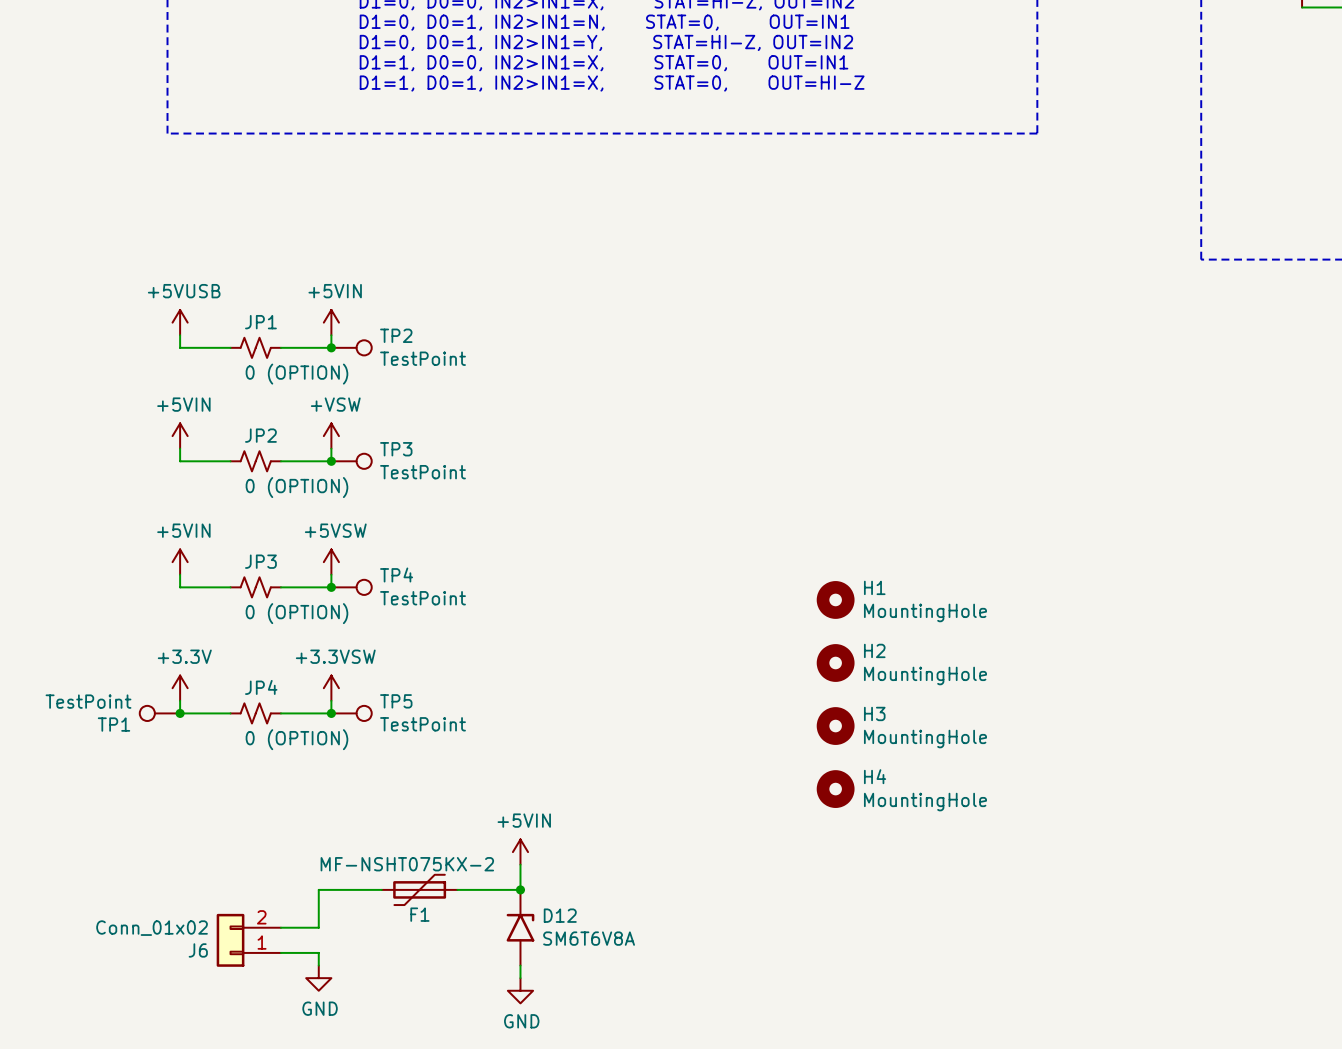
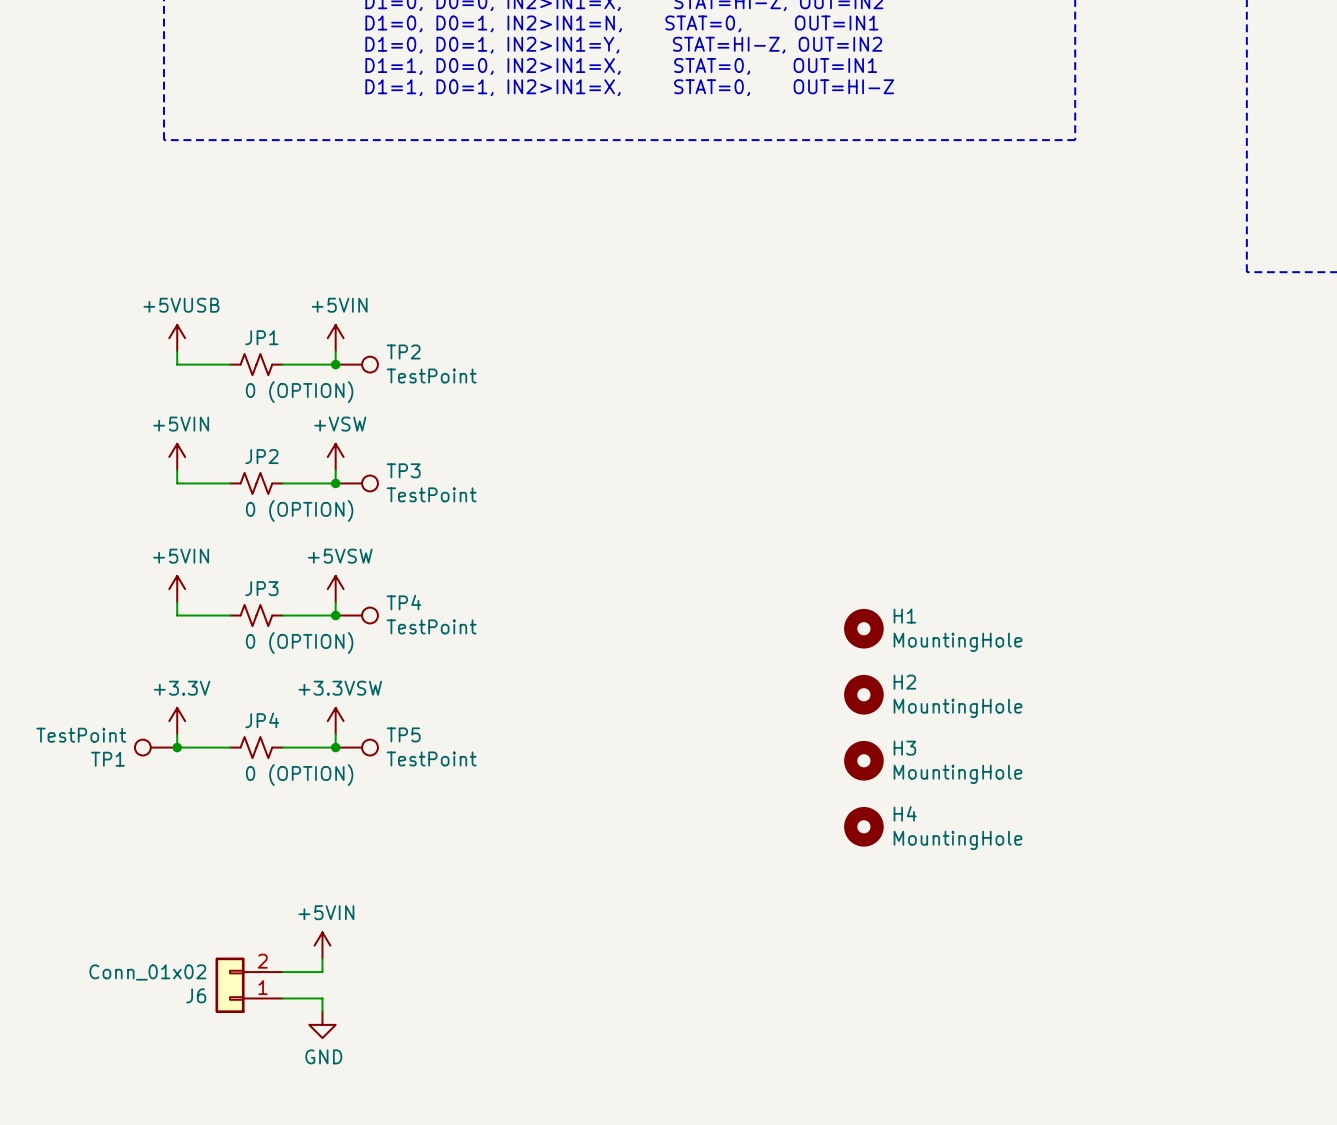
power symbol position: +5VIN (520, 852) -> +5VIN (322, 945)
wire: (520, 864) (520, 889) (457, 889) -> none
wire: (381, 889) (318, 889) (318, 915) -> none
F1: MF-NSHT075KX-2 (419, 889) -> none
junction: (520, 889) -> none
D12: SM6T6V8A (520, 927) -> none
wire: (520, 965) (520, 978) -> none
power symbol: GND (520, 990) -> none

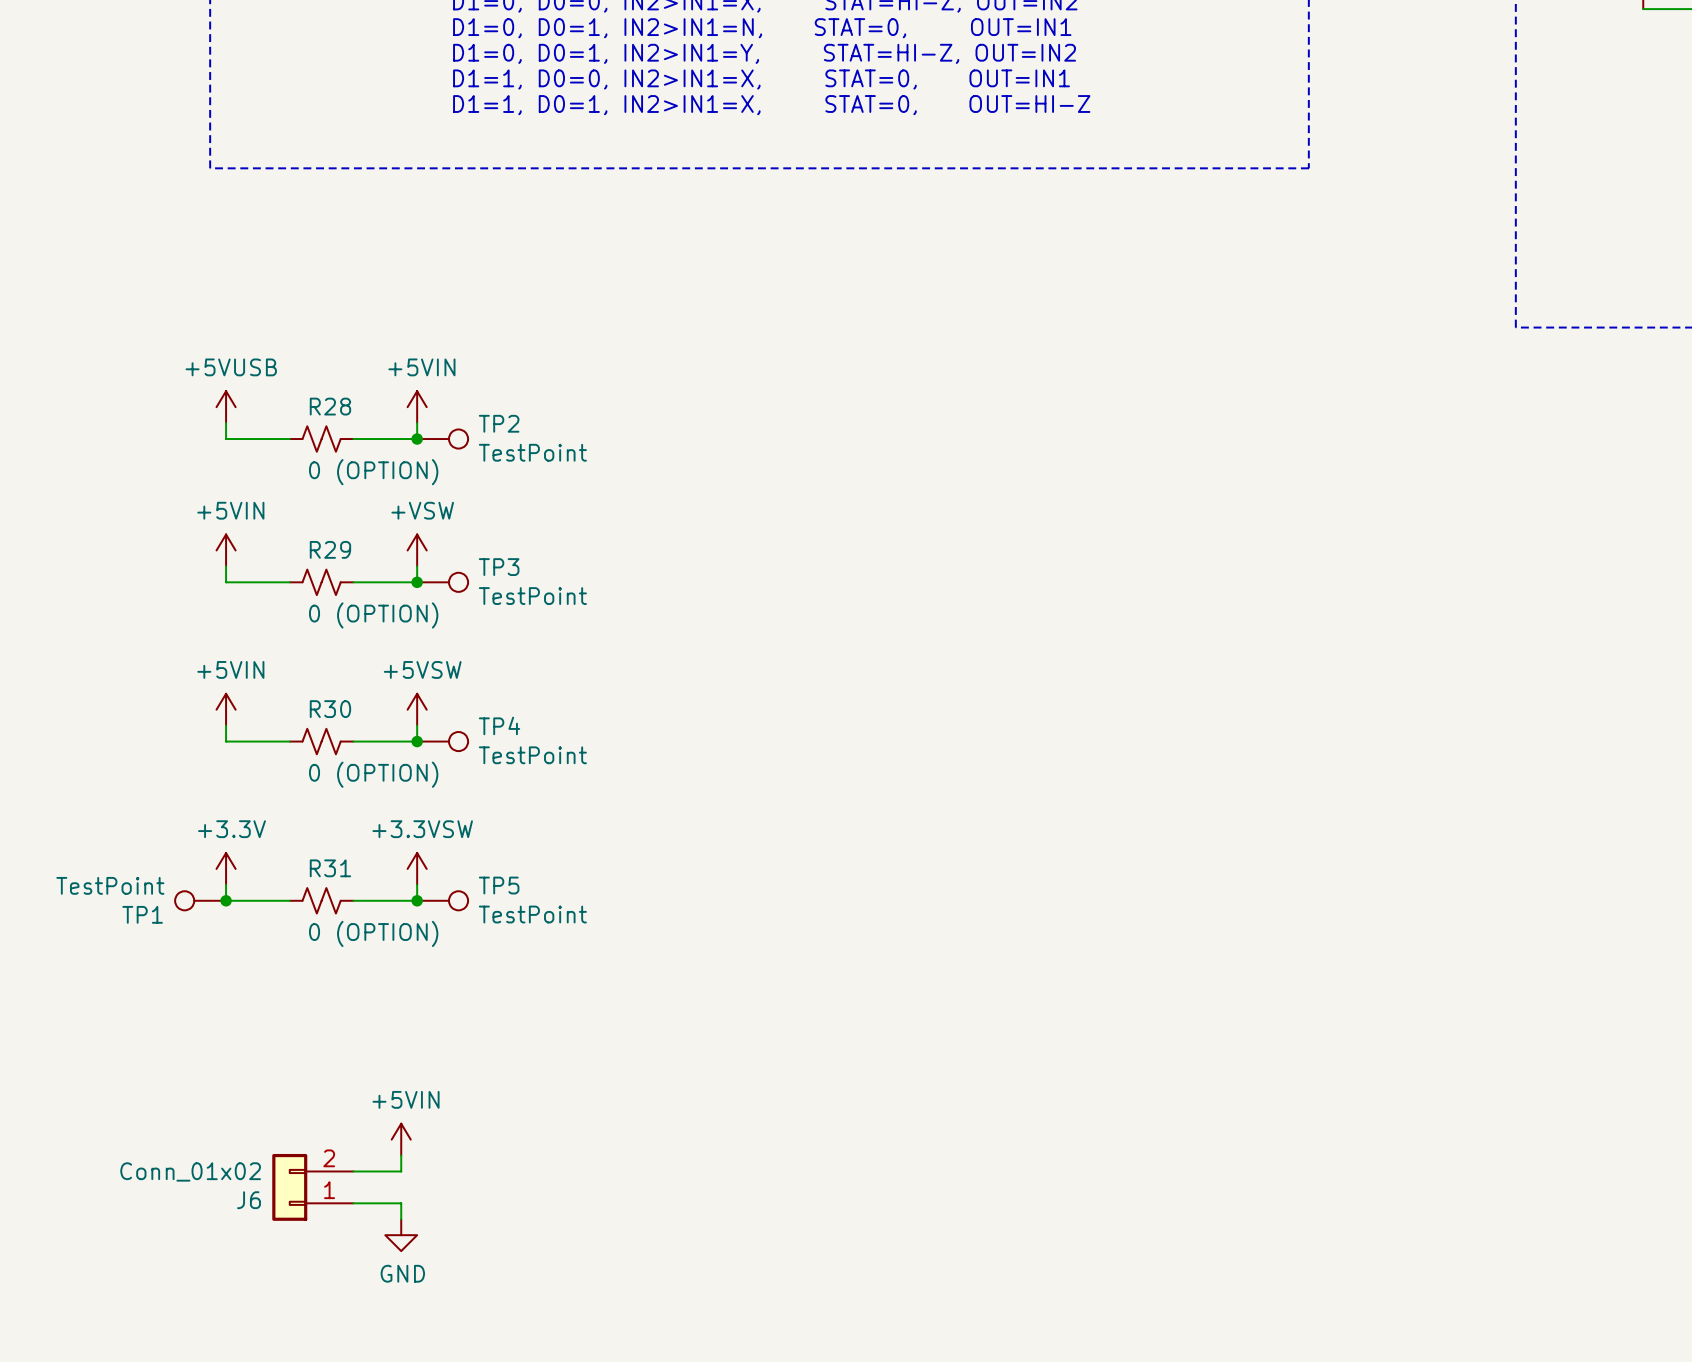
JP1 name: JP1 (261, 337) -> R28 (330, 406)
JP2 name: JP2 (261, 456) -> R29 (330, 549)
JP3 name: JP3 (261, 588) -> R30 (330, 709)
H1: MountingHole (863, 628) -> none
H2: MountingHole (863, 694) -> none
JP4 name: JP4 (262, 720) -> R31 (330, 868)
H3: MountingHole (863, 760) -> none
H4: MountingHole (863, 826) -> none

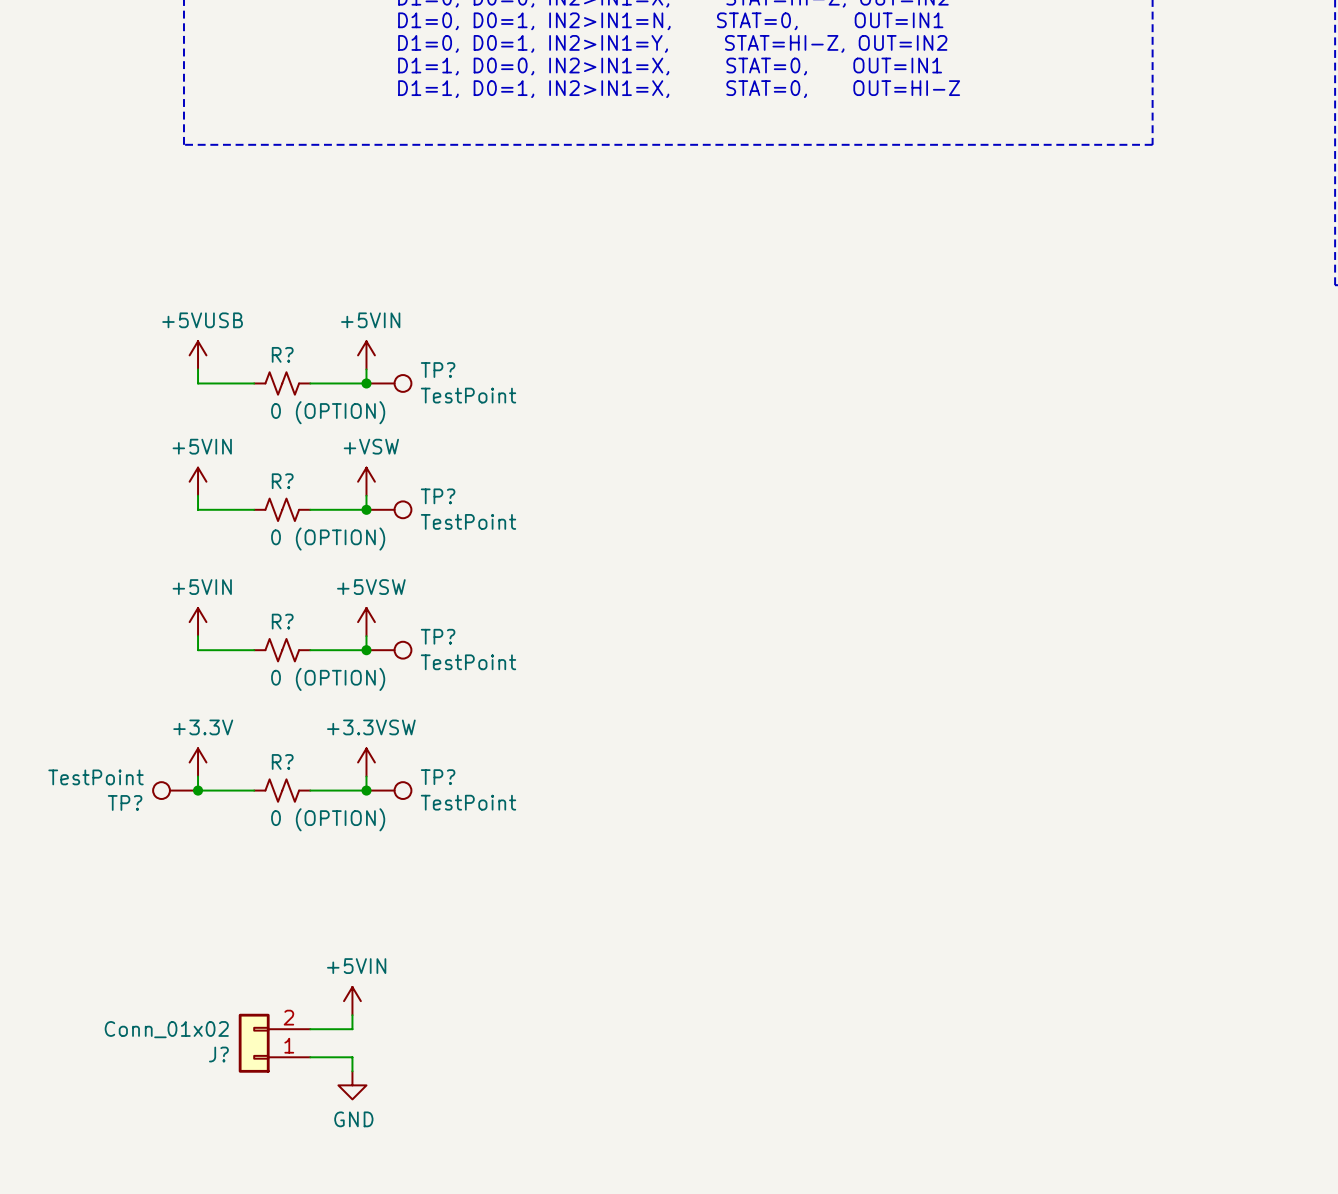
R28 name: R28 (330, 406) -> R? (282, 354)
TP2 name: TP2 (499, 423) -> TP? (438, 370)
R29 name: R29 (330, 549) -> R? (282, 481)
TP3 name: TP3 (499, 567) -> TP? (438, 496)
R30 name: R30 (330, 709) -> R? (282, 621)
TP4 name: TP4 (499, 725) -> TP? (438, 636)
R31 name: R31 (330, 868) -> R? (282, 761)
TP5 name: TP5 (499, 885) -> TP? (438, 777)
TP1 name: TP1 (142, 914) -> TP? (125, 802)
J6 name: J6 (249, 1200) -> J? (218, 1054)

